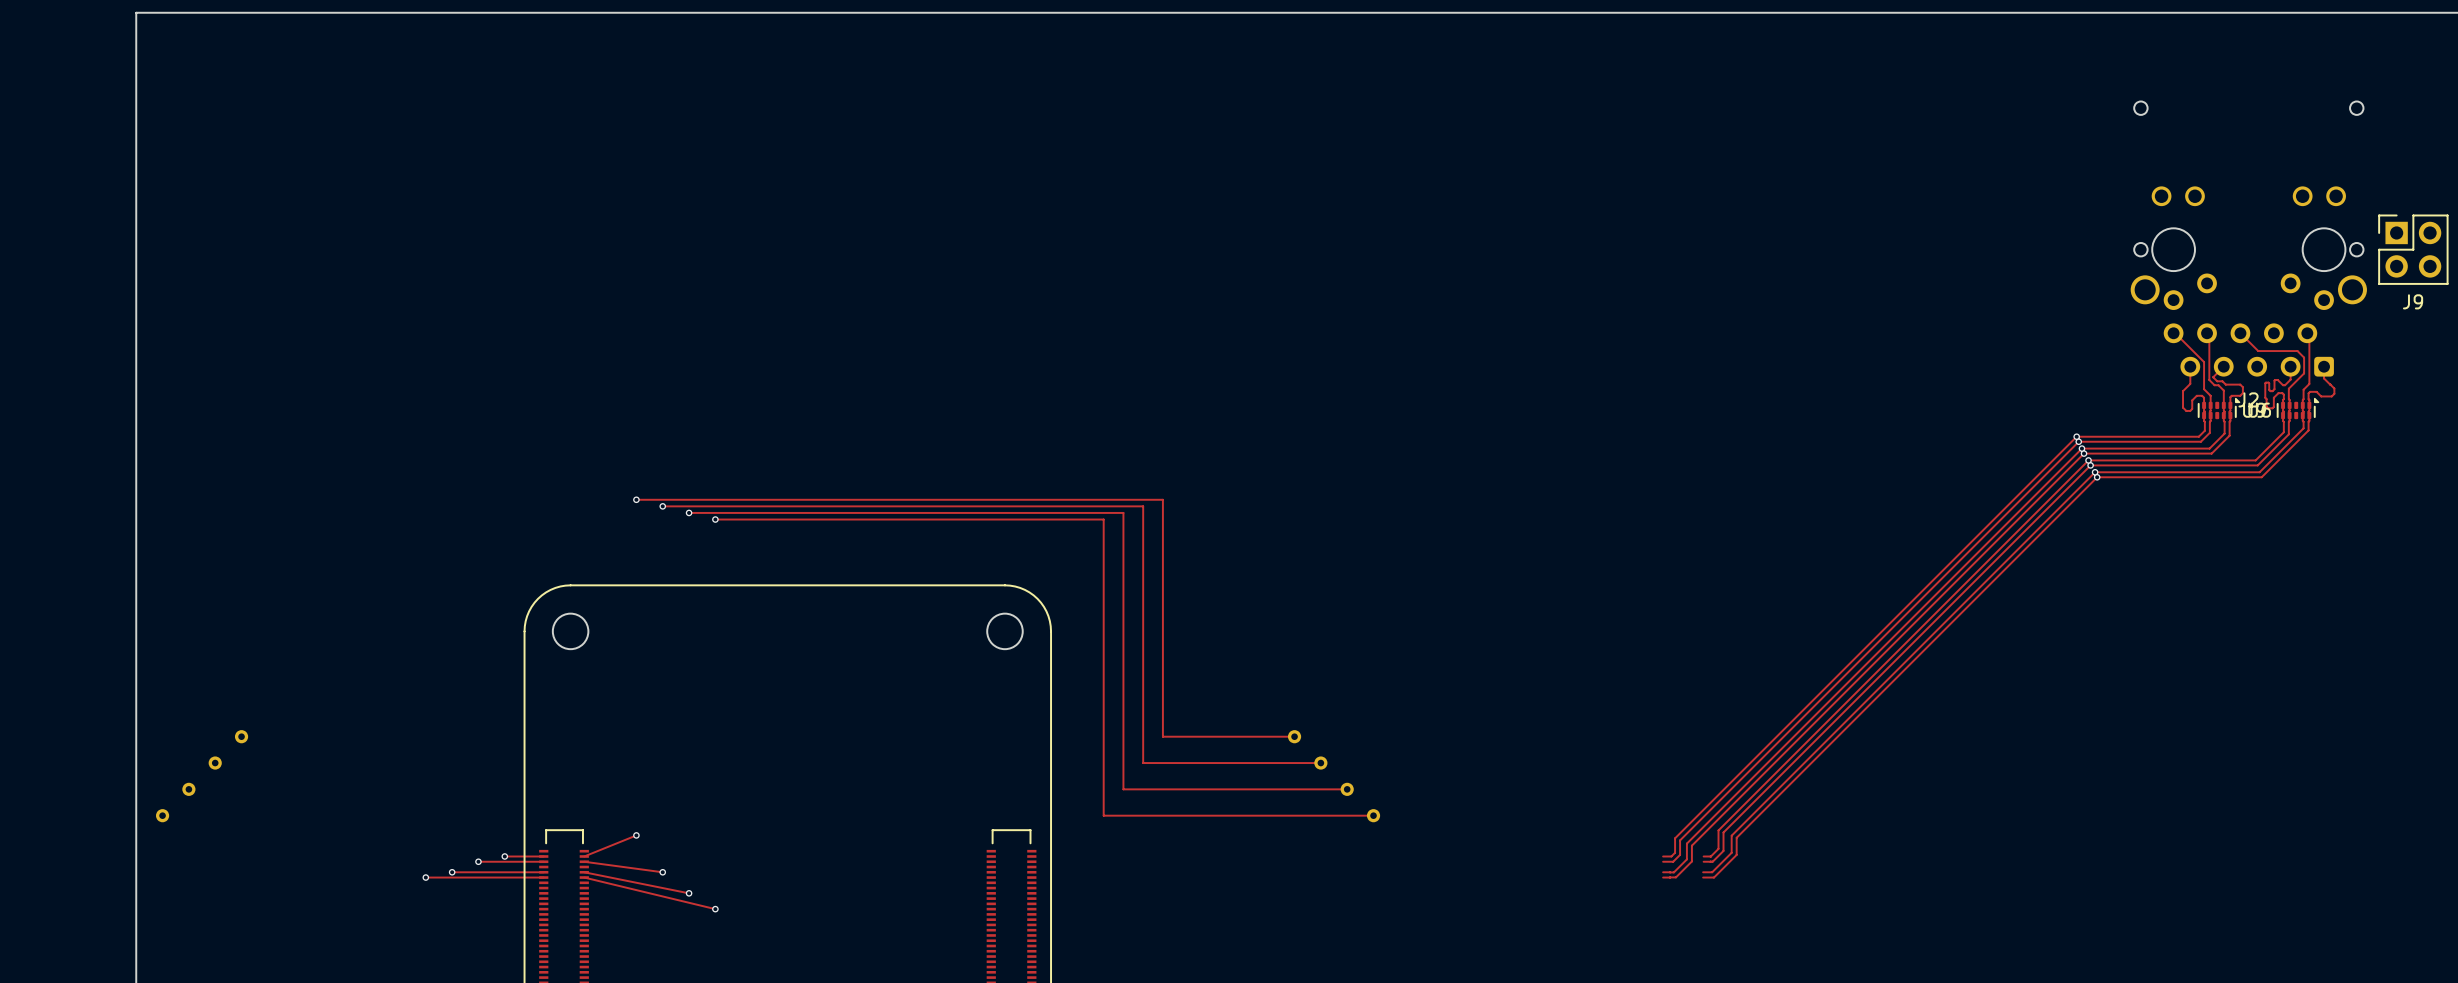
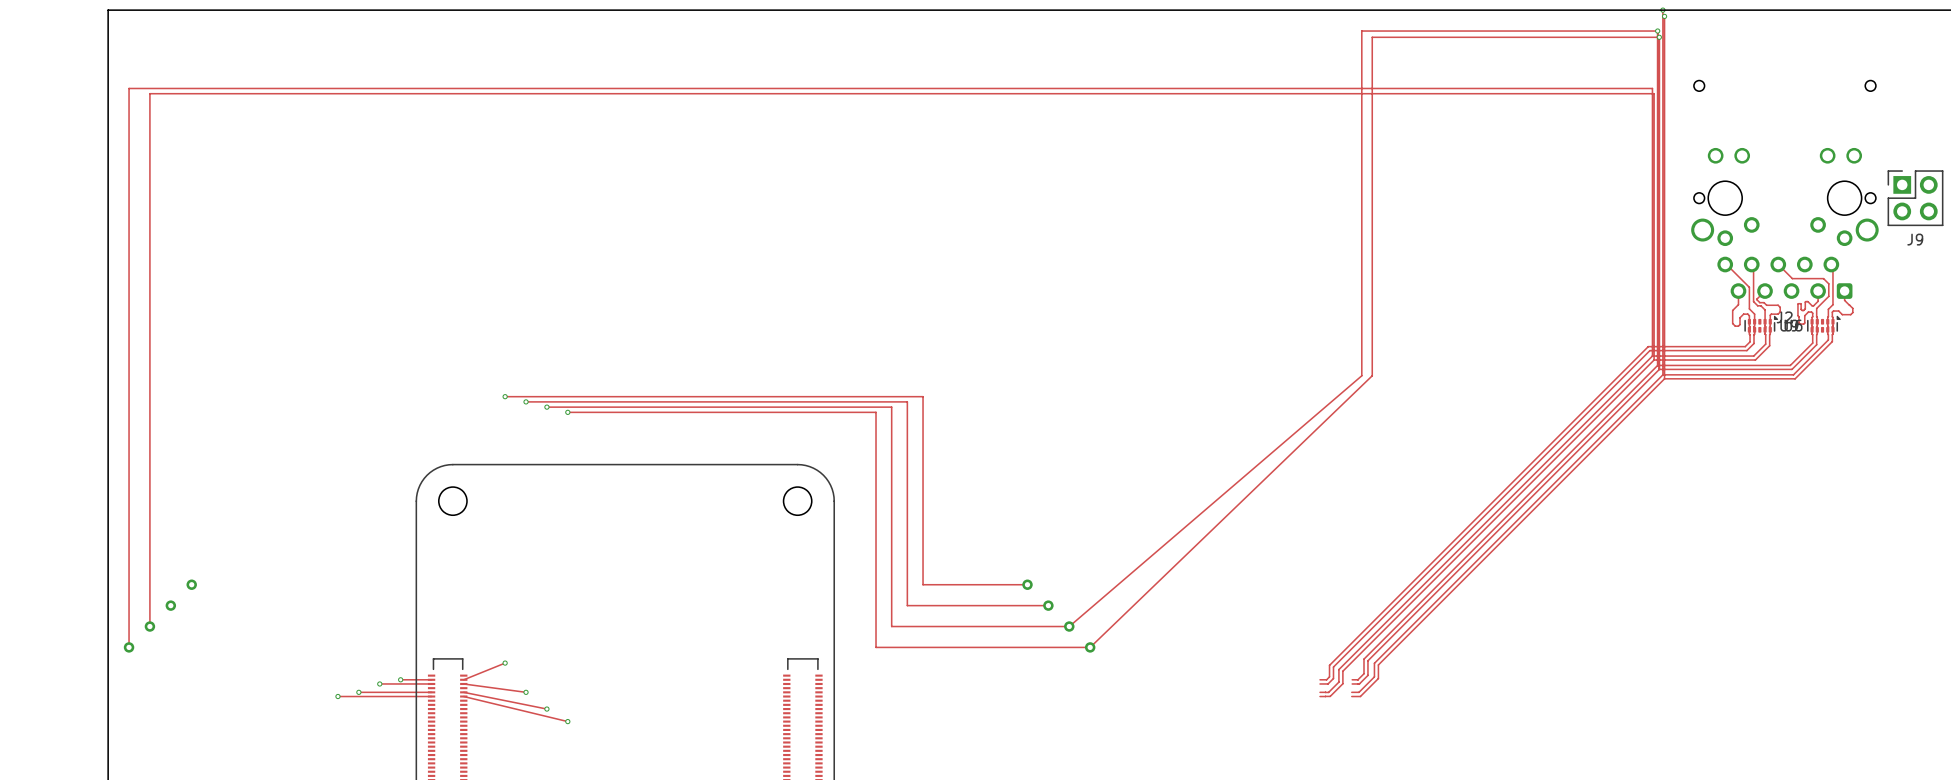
track: none -> (1662, 10) (1662, 374)
via: none -> (1662, 10)
track: none -> (1664, 16) (1664, 378)
via: none -> (1664, 16)
via: none -> (1657, 31)
via: none -> (1659, 37)
via: (2076, 436) -> none
via: (2078, 441) -> none
track: none -> (1652, 356) (1652, 88) (129, 88) (129, 647)
via: (2081, 448) -> none
track: none -> (1654, 360) (1654, 93) (149, 93) (149, 626)
via: (2084, 453) -> none
track: none -> (1657, 365) (1657, 31) (1361, 31) (1361, 375) (1069, 626)
via: (2088, 460) -> none
track: none -> (1659, 369) (1659, 37) (1372, 37) (1372, 375) (1090, 647)
via: (2090, 465) -> none
via: (2095, 472) -> none
via: (2097, 477) -> none

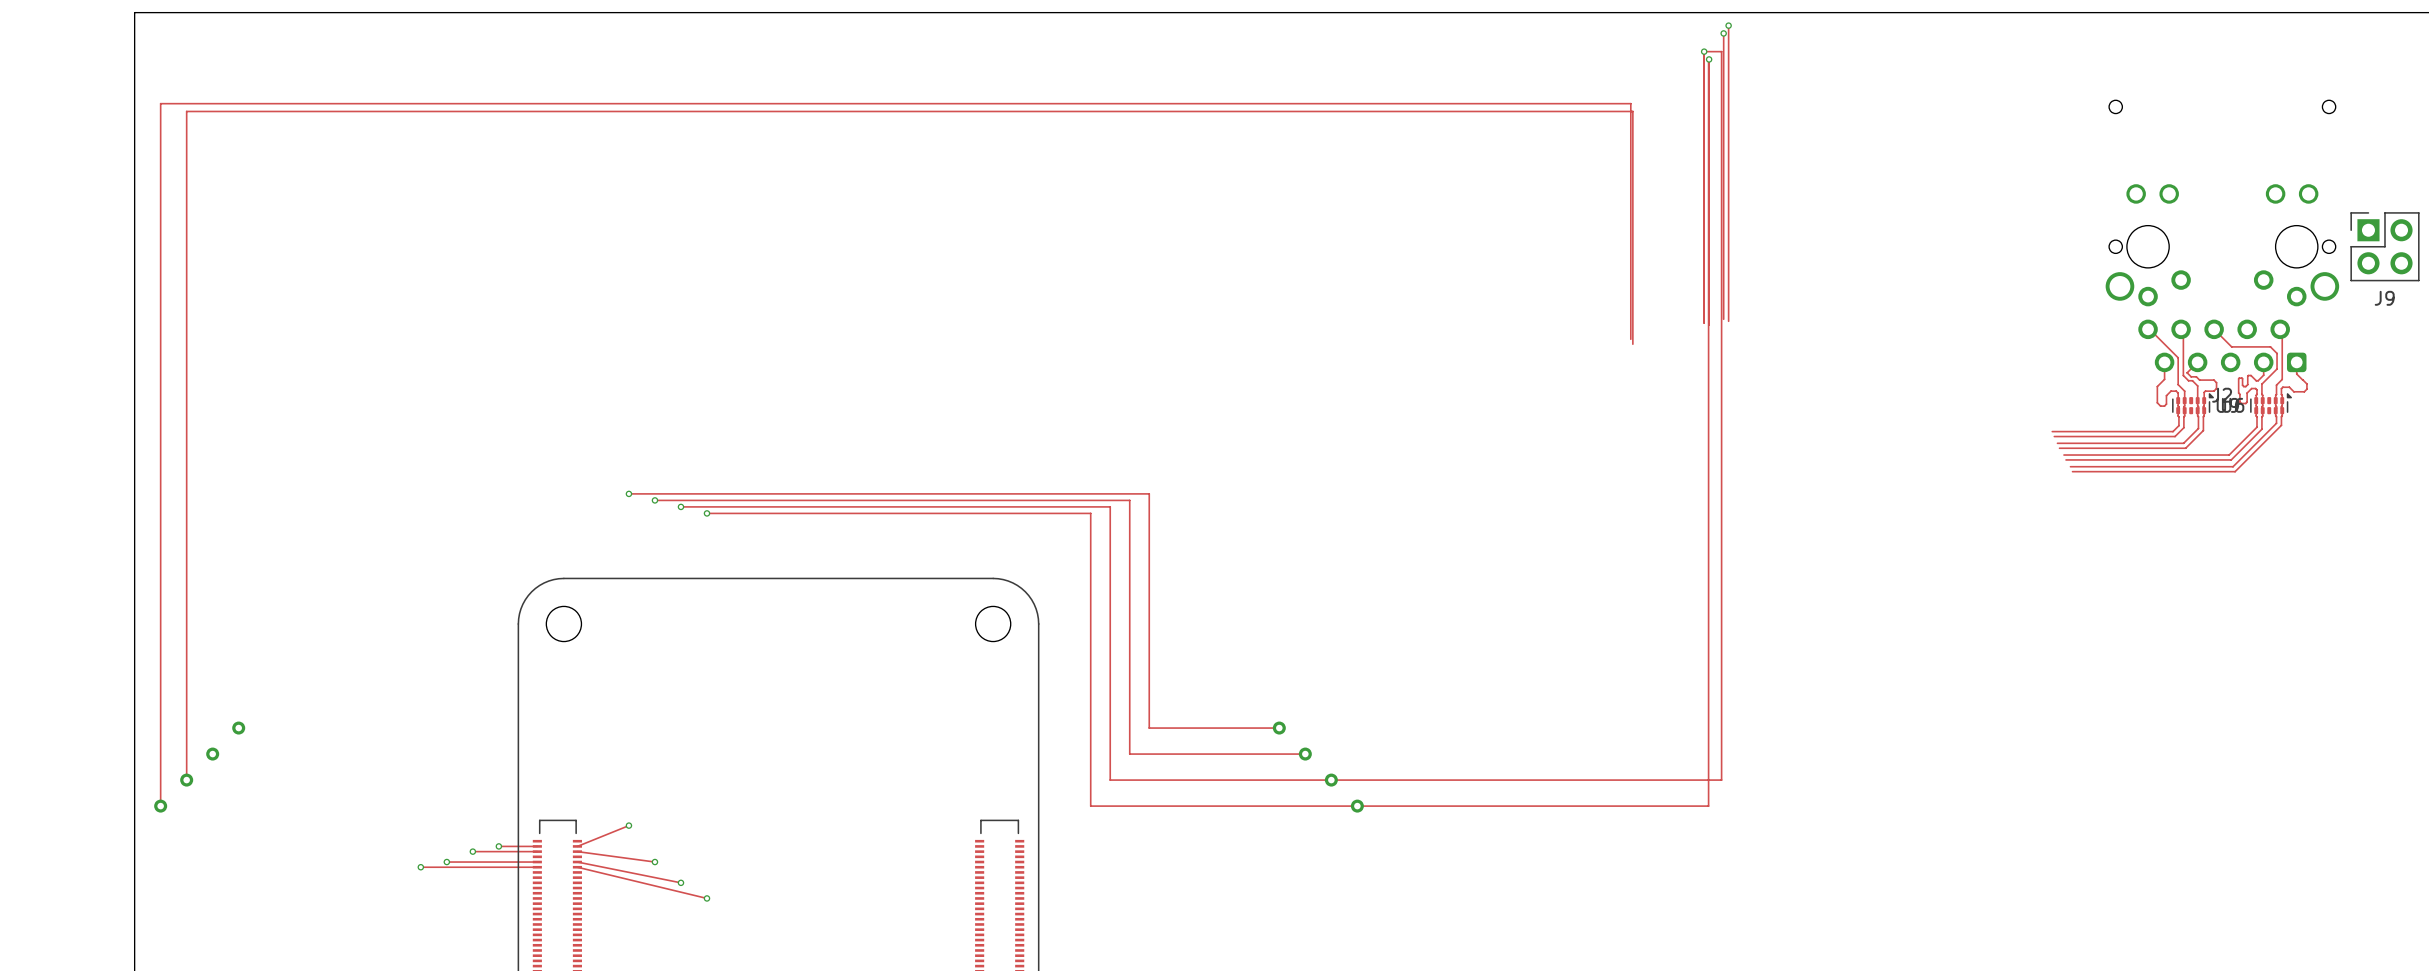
track: (1662, 10) (1662, 374) (1374, 663) (1374, 676) (1359, 692) (1351, 692) -> none
via: (1662, 10) -> none
track: (1664, 16) (1664, 378) (1378, 664) (1378, 678) (1360, 696) (1351, 696) -> none
via: (1664, 16) -> none
track: none -> (1728, 25) (1728, 321)
via: none -> (1728, 25)
track: none -> (1723, 33) (1723, 319)
via: none -> (1723, 33)
via: (1657, 31) -> none
via: (1659, 37) -> none
via: none -> (1704, 51)
track: (1372, 47) (1372, 37) (1659, 37) (1659, 369) (1367, 660) (1367, 675) (1357, 683) -> (1708, 59) (1709, 325)
via: none -> (1709, 59)
track: (129, 88) (1652, 88) (1652, 356) (1338, 669) (1338, 682) (1328, 692) (1325, 692) -> (160, 110) (160, 103) (1630, 103) (1630, 339)
track: (149, 93) (1654, 93) (1654, 360) (1342, 671) (1342, 683) (1330, 696) (1325, 696) -> (186, 116) (186, 111) (1632, 111) (1632, 344)
track: (1648, 346) (1329, 665) (1329, 676) (1326, 679) (1320, 679) -> none
track: (1649, 350) (1333, 667) (1333, 678) (1328, 683) (1320, 683) -> none
track: (1372, 375) (1090, 647) -> (1708, 467) (1708, 806) (1357, 806)
track: (1069, 626) (1361, 375) (1361, 31) (1657, 31) (1657, 365) (1364, 659) (1364, 673) (1357, 679) -> (1331, 780) (1721, 780) (1721, 51) (1704, 51) (1704, 323)
track: (1352, 679) (1357, 679) -> none
track: (1352, 683) (1357, 683) -> none
track: (1320, 692) (1325, 692) -> none
track: (1320, 696) (1325, 696) -> none

